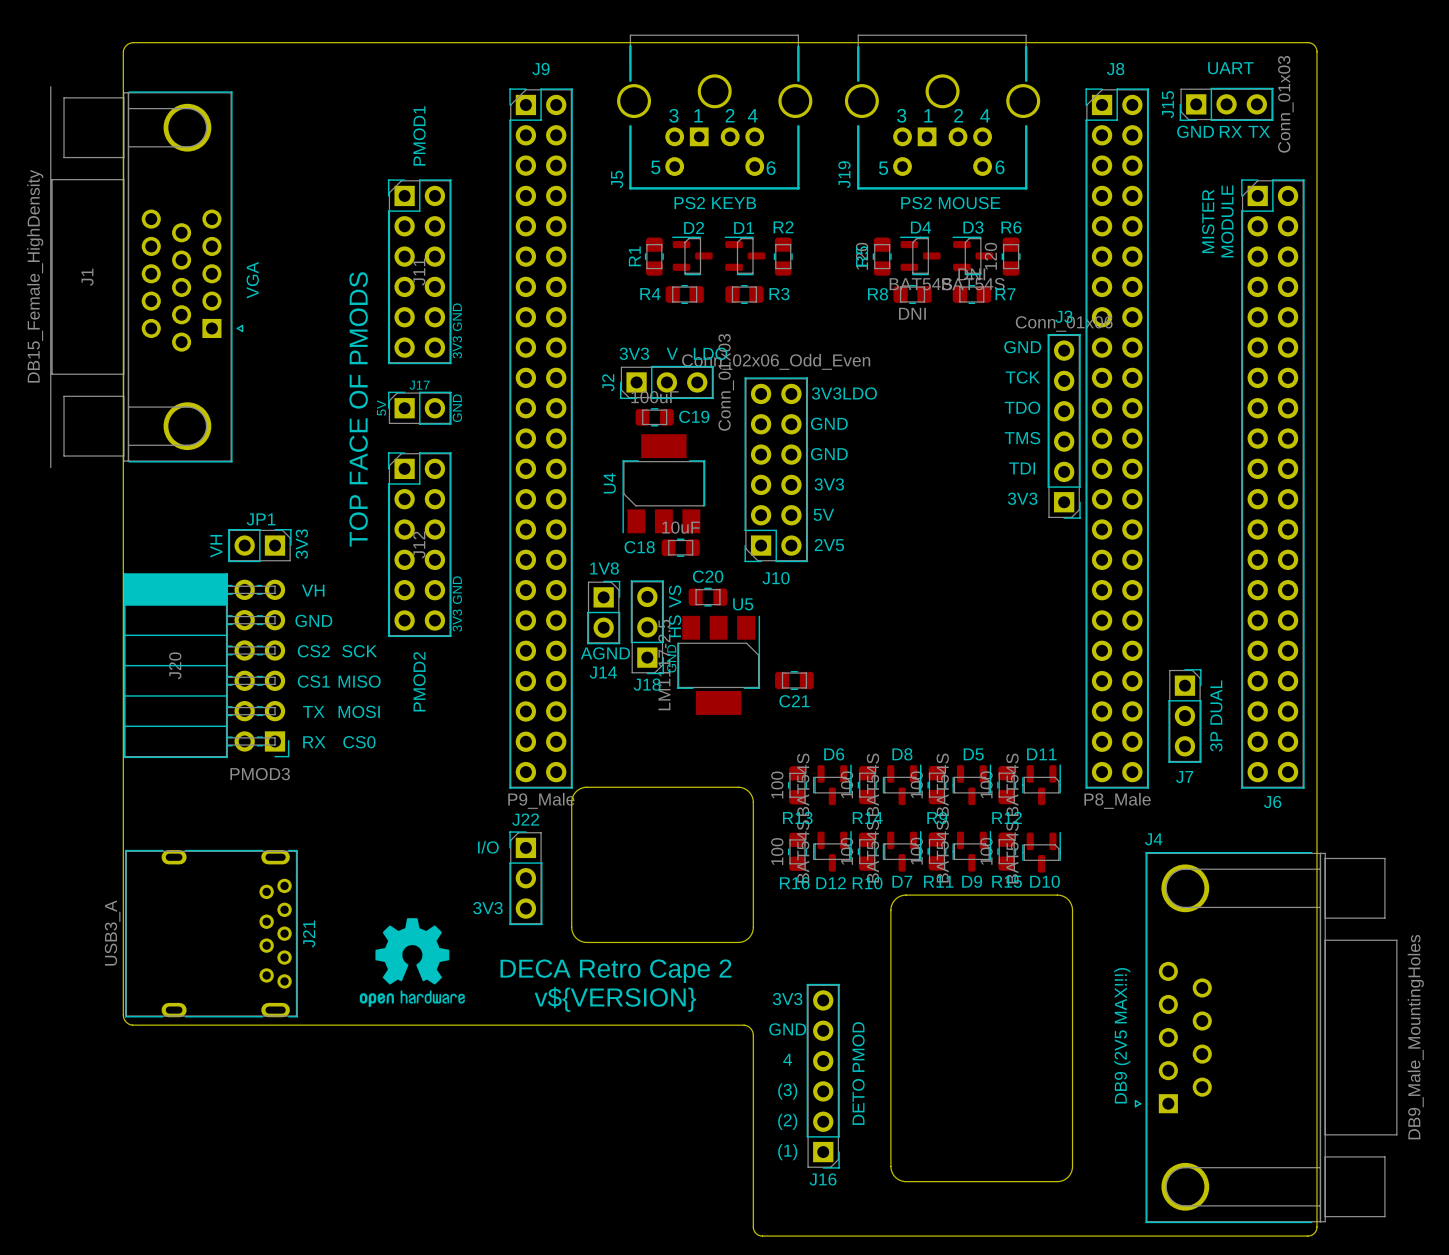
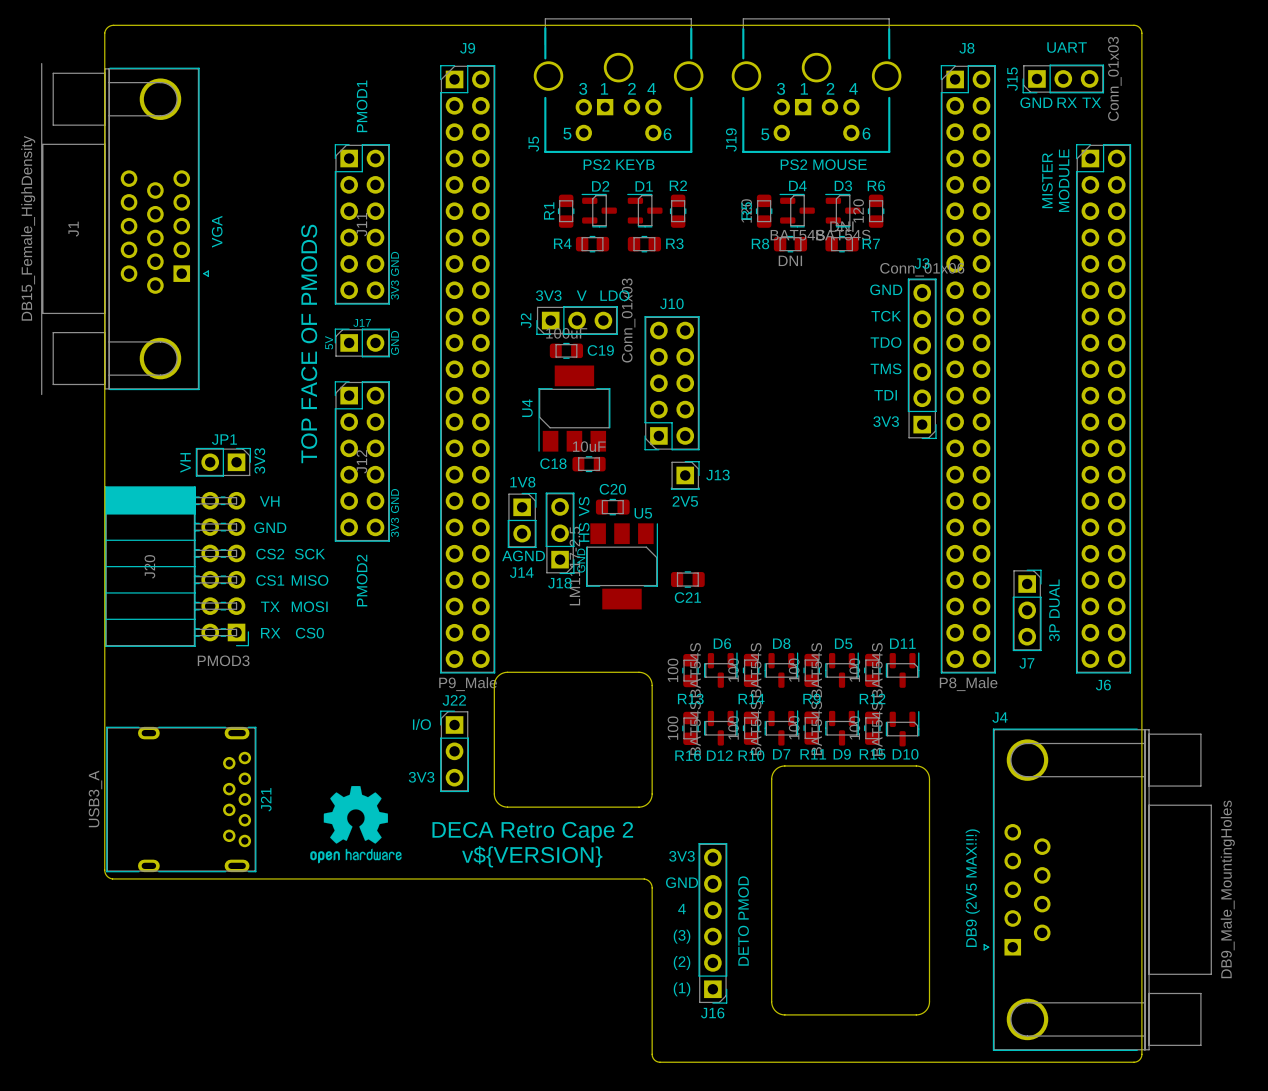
J10 value: Conn_02x06_Odd_Even (776, 361) -> none
J10 footprint: [744, 377, 809, 563] -> [644, 316, 700, 451]
text: 3V3LDO (844, 393) -> none
text: GND (829, 423) -> none
text: GND (829, 454) -> none
text: 3V3 (829, 484) -> none
text: 5V (823, 514) -> none
text position: 2V5 (829, 545) -> 2V5 (685, 501)
J13: none -> (685, 475)
J10 name position: J10 (776, 578) -> J10 (671, 303)

